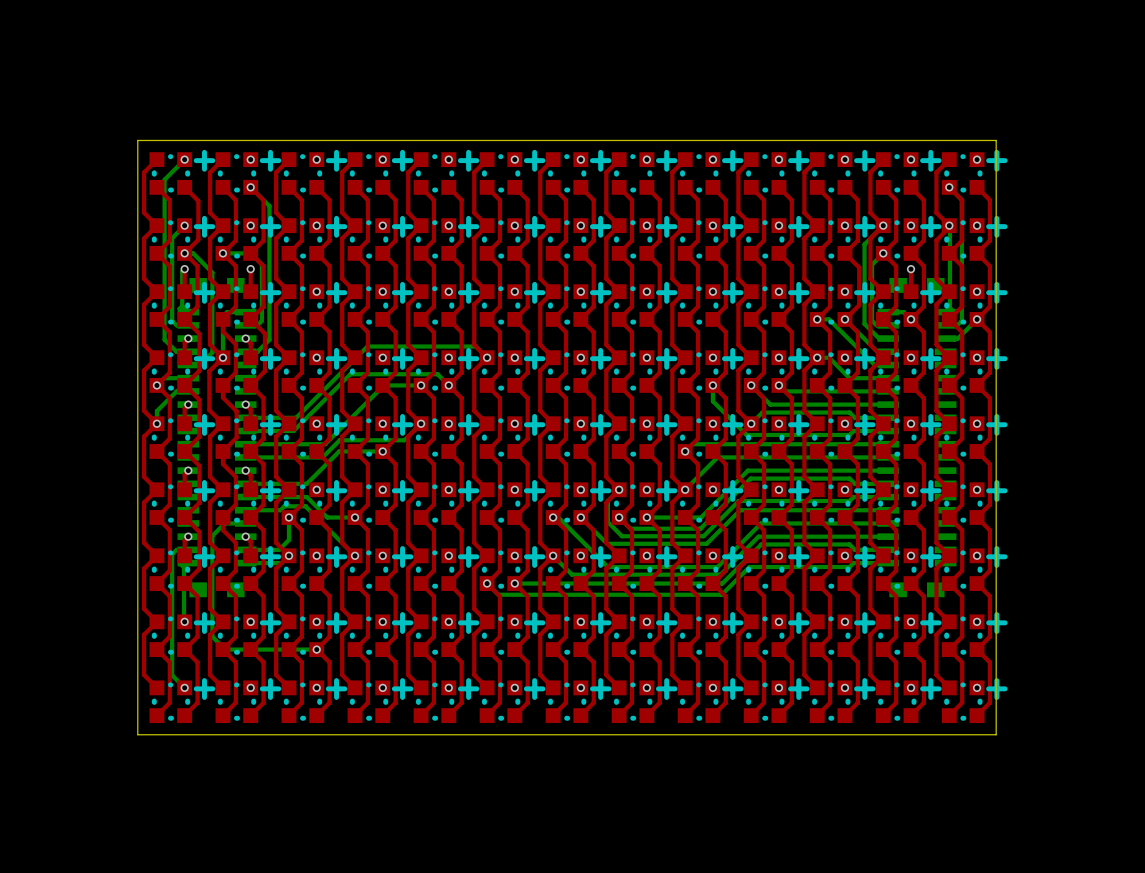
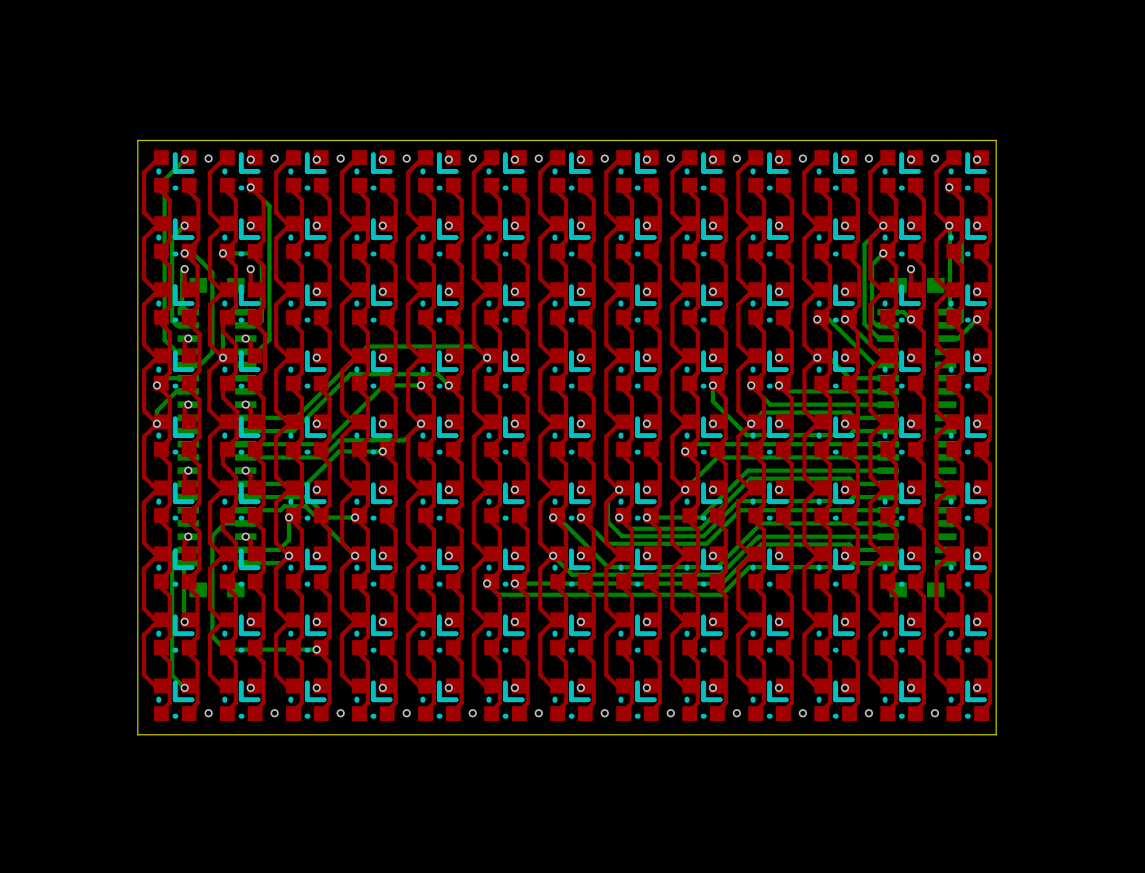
part footprint: [149, 149, 216, 195] -> [153, 150, 197, 193]
part footprint: [215, 149, 282, 195] -> [220, 150, 263, 193]
part footprint: [281, 149, 348, 195] -> [286, 150, 329, 193]
part footprint: [347, 149, 414, 195] -> [352, 150, 395, 193]
part footprint: [413, 149, 480, 195] -> [418, 150, 461, 193]
part footprint: [479, 149, 546, 195] -> [484, 150, 527, 193]
part footprint: [545, 149, 612, 195] -> [550, 150, 593, 193]
part footprint: [611, 149, 678, 195] -> [616, 150, 659, 193]
part footprint: [677, 149, 744, 195] -> [682, 150, 725, 193]
part footprint: [743, 149, 810, 195] -> [748, 150, 791, 193]
part footprint: [809, 149, 876, 195] -> [814, 150, 857, 193]
part footprint: [875, 149, 942, 195] -> [880, 150, 923, 193]
part footprint: [941, 149, 1008, 195] -> [946, 150, 989, 193]
via: none -> (208, 158)
via: none -> (274, 158)
via: none -> (340, 158)
via: none -> (406, 158)
via: none -> (472, 158)
via: none -> (538, 158)
via: none -> (604, 158)
via: none -> (670, 158)
via: none -> (736, 158)
via: none -> (802, 158)
via: none -> (868, 158)
via: none -> (934, 158)
part footprint: [149, 215, 216, 261] -> [153, 216, 197, 259]
part footprint: [215, 215, 282, 261] -> [220, 216, 263, 259]
part footprint: [281, 215, 348, 261] -> [286, 216, 329, 259]
part footprint: [347, 215, 414, 261] -> [352, 216, 395, 259]
part footprint: [413, 215, 480, 261] -> [418, 216, 461, 259]
part footprint: [479, 215, 546, 261] -> [484, 216, 527, 259]
part footprint: [545, 215, 612, 261] -> [550, 216, 593, 259]
part footprint: [611, 215, 678, 261] -> [616, 216, 659, 259]
part footprint: [677, 215, 744, 261] -> [682, 216, 725, 259]
part footprint: [743, 215, 810, 261] -> [748, 216, 791, 259]
part footprint: [809, 215, 876, 261] -> [814, 216, 857, 259]
part footprint: [875, 215, 942, 261] -> [880, 216, 923, 259]
part footprint: [941, 215, 1008, 261] -> [946, 216, 989, 259]
part footprint: [149, 281, 216, 327] -> [153, 282, 197, 325]
part footprint: [215, 281, 282, 327] -> [220, 282, 263, 325]
part footprint: [281, 281, 348, 327] -> [286, 282, 329, 325]
part footprint: [347, 281, 414, 327] -> [352, 282, 395, 325]
part footprint: [413, 281, 480, 327] -> [418, 282, 461, 325]
part footprint: [479, 281, 546, 327] -> [484, 282, 527, 325]
part footprint: [545, 281, 612, 327] -> [550, 282, 593, 325]
part footprint: [611, 281, 678, 327] -> [616, 282, 659, 325]
part footprint: [677, 281, 744, 327] -> [682, 282, 725, 325]
part footprint: [743, 281, 810, 327] -> [748, 282, 791, 325]
part footprint: [809, 281, 876, 327] -> [814, 282, 857, 325]
part footprint: [875, 281, 942, 327] -> [880, 282, 923, 325]
part footprint: [941, 281, 1008, 327] -> [946, 282, 989, 325]
part footprint: [149, 347, 216, 393] -> [153, 348, 197, 391]
part footprint: [215, 347, 282, 393] -> [220, 348, 263, 391]
part footprint: [281, 347, 348, 393] -> [286, 348, 329, 391]
part footprint: [347, 347, 414, 393] -> [352, 348, 395, 391]
part footprint: [413, 347, 480, 393] -> [418, 348, 461, 391]
part footprint: [479, 347, 546, 393] -> [484, 348, 527, 391]
part footprint: [545, 347, 612, 393] -> [550, 348, 593, 391]
part footprint: [611, 347, 678, 393] -> [616, 348, 659, 391]
part footprint: [677, 347, 744, 393] -> [682, 348, 725, 391]
part footprint: [743, 347, 810, 393] -> [748, 348, 791, 391]
part footprint: [809, 347, 876, 393] -> [814, 348, 857, 391]
part footprint: [875, 347, 942, 393] -> [880, 348, 923, 391]
part footprint: [941, 347, 1008, 393] -> [946, 348, 989, 391]
part footprint: [149, 414, 216, 459] -> [153, 414, 197, 457]
part footprint: [215, 414, 282, 459] -> [220, 414, 263, 457]
part footprint: [281, 414, 348, 459] -> [286, 414, 329, 457]
part footprint: [347, 414, 414, 459] -> [352, 414, 395, 457]
part footprint: [413, 414, 480, 459] -> [418, 414, 461, 457]
part footprint: [479, 414, 546, 459] -> [484, 414, 527, 457]
part footprint: [545, 414, 612, 459] -> [550, 414, 593, 457]
part footprint: [611, 414, 678, 459] -> [616, 414, 659, 457]
part footprint: [677, 414, 744, 459] -> [682, 414, 725, 457]
part footprint: [743, 414, 810, 459] -> [748, 414, 791, 457]
part footprint: [809, 414, 876, 459] -> [814, 414, 857, 457]
part footprint: [875, 414, 942, 459] -> [880, 414, 923, 457]
part footprint: [941, 414, 1008, 459] -> [946, 414, 989, 457]
part footprint: [149, 480, 216, 525] -> [153, 480, 197, 523]
part footprint: [215, 480, 282, 525] -> [220, 480, 263, 523]
part footprint: [281, 480, 348, 525] -> [286, 480, 329, 523]
part footprint: [347, 480, 414, 525] -> [352, 480, 395, 523]
part footprint: [413, 480, 480, 525] -> [418, 480, 461, 523]
part footprint: [479, 480, 546, 525] -> [484, 480, 527, 523]
part footprint: [545, 480, 612, 525] -> [550, 480, 593, 523]
part footprint: [611, 480, 678, 525] -> [616, 480, 659, 523]
part footprint: [677, 480, 744, 525] -> [682, 480, 725, 523]
part footprint: [743, 480, 810, 525] -> [748, 480, 791, 523]
part footprint: [809, 480, 876, 525] -> [814, 480, 857, 523]
part footprint: [875, 480, 942, 525] -> [880, 480, 923, 523]
part footprint: [941, 480, 1008, 525] -> [946, 480, 989, 523]
part footprint: [149, 546, 216, 591] -> [153, 546, 197, 589]
part footprint: [215, 546, 282, 591] -> [220, 546, 263, 589]
part footprint: [281, 546, 348, 591] -> [286, 546, 329, 589]
part footprint: [347, 546, 414, 591] -> [352, 546, 395, 589]
part footprint: [413, 546, 480, 591] -> [418, 546, 461, 589]
part footprint: [479, 546, 546, 591] -> [484, 546, 527, 589]
part footprint: [545, 546, 612, 591] -> [550, 546, 593, 589]
part footprint: [611, 546, 678, 591] -> [616, 546, 659, 589]
part footprint: [677, 546, 744, 591] -> [682, 546, 725, 589]
part footprint: [743, 546, 810, 591] -> [748, 546, 791, 589]
part footprint: [809, 546, 876, 591] -> [814, 546, 857, 589]
part footprint: [875, 546, 942, 591] -> [880, 546, 923, 589]
part footprint: [941, 546, 1008, 591] -> [946, 546, 989, 589]
part footprint: [149, 612, 216, 658] -> [153, 612, 197, 655]
part footprint: [215, 612, 282, 658] -> [220, 612, 263, 655]
part footprint: [281, 612, 348, 658] -> [286, 612, 329, 655]
part footprint: [347, 612, 414, 658] -> [352, 612, 395, 655]
part footprint: [413, 612, 480, 658] -> [418, 612, 461, 655]
part footprint: [479, 612, 546, 658] -> [484, 612, 527, 655]
part footprint: [545, 612, 612, 658] -> [550, 612, 593, 655]
part footprint: [611, 612, 678, 658] -> [616, 612, 659, 655]
part footprint: [677, 612, 744, 658] -> [682, 612, 725, 655]
part footprint: [743, 612, 810, 658] -> [748, 612, 791, 655]
part footprint: [809, 612, 876, 658] -> [814, 612, 857, 655]
part footprint: [875, 612, 942, 658] -> [880, 612, 923, 655]
part footprint: [941, 612, 1008, 658] -> [946, 612, 989, 655]
part footprint: [149, 678, 216, 724] -> [153, 678, 197, 722]
part footprint: [215, 678, 282, 724] -> [220, 678, 263, 722]
part footprint: [281, 678, 348, 724] -> [286, 678, 329, 722]
part footprint: [347, 678, 414, 724] -> [352, 678, 395, 722]
part footprint: [413, 678, 480, 724] -> [418, 678, 461, 722]
part footprint: [479, 678, 546, 724] -> [484, 678, 527, 722]
part footprint: [545, 678, 612, 724] -> [550, 678, 593, 722]
part footprint: [611, 678, 678, 724] -> [616, 678, 659, 722]
part footprint: [677, 678, 744, 724] -> [682, 678, 725, 722]
part footprint: [743, 678, 810, 724] -> [748, 678, 791, 722]
part footprint: [809, 678, 876, 724] -> [814, 678, 857, 722]
part footprint: [875, 678, 942, 724] -> [880, 678, 923, 722]
part footprint: [941, 678, 1008, 724] -> [946, 678, 989, 722]
via: none -> (208, 713)
via: none -> (274, 713)
via: none -> (340, 713)
via: none -> (406, 713)
via: none -> (472, 713)
via: none -> (538, 713)
via: none -> (604, 713)
via: none -> (670, 713)
via: none -> (736, 713)
via: none -> (802, 713)
via: none -> (868, 713)
via: none -> (934, 713)

